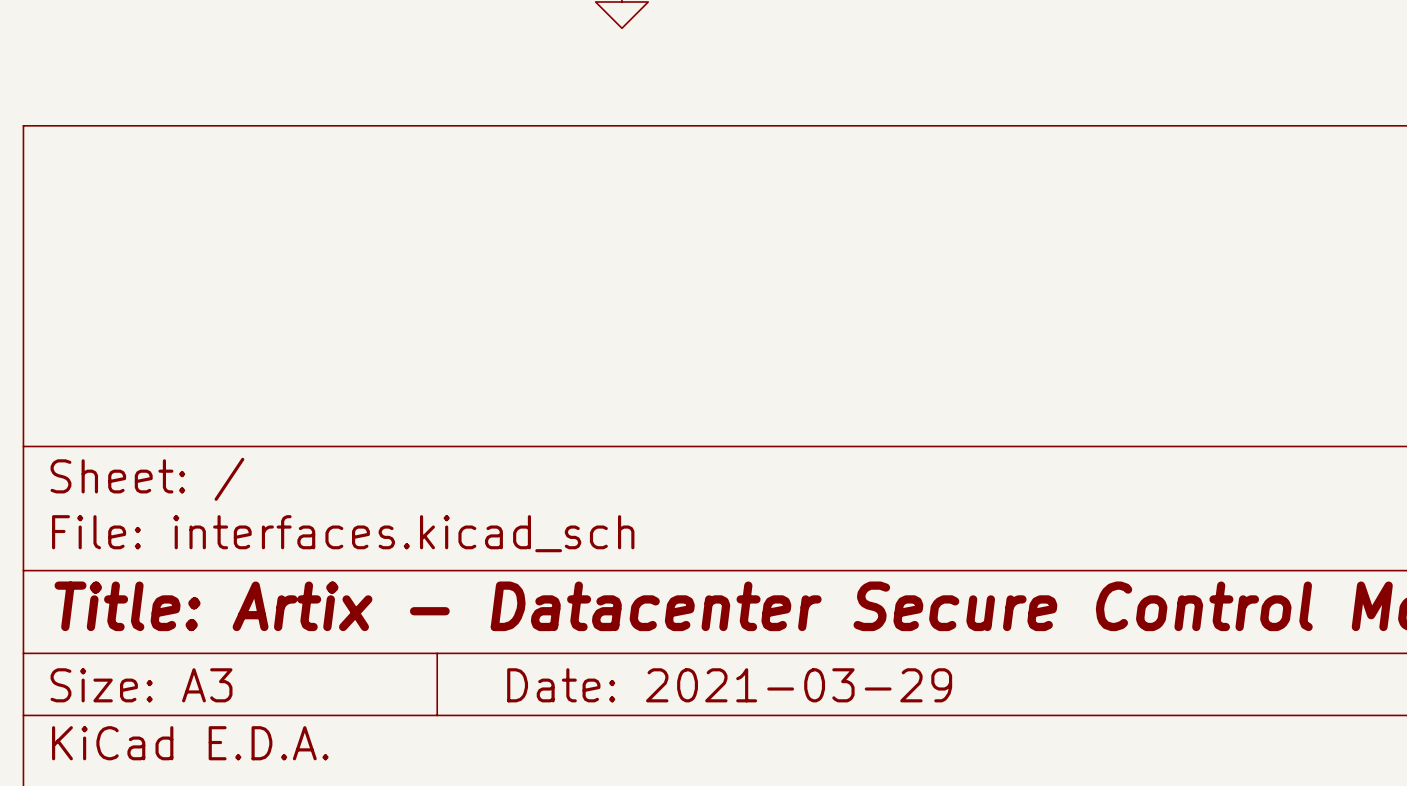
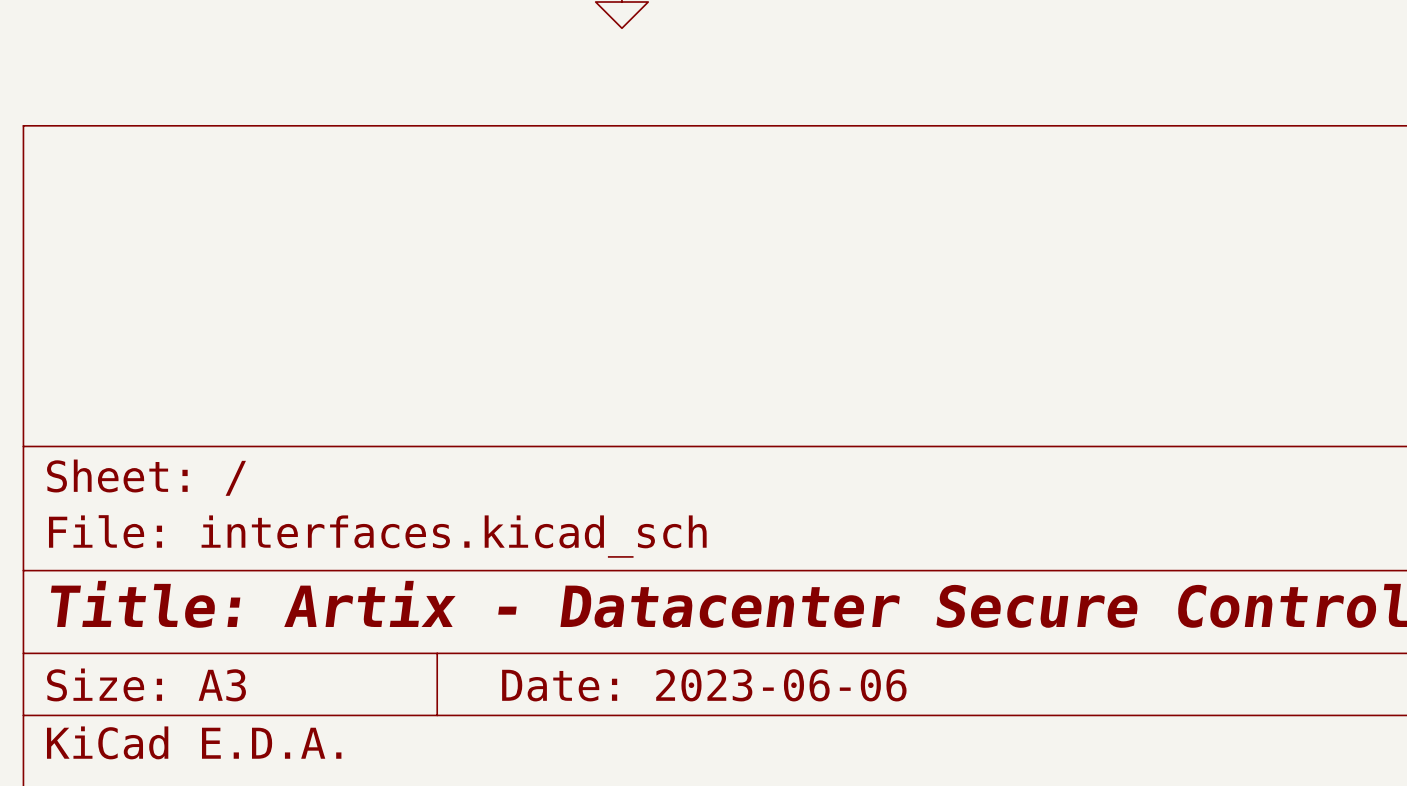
title block: Date: 2021-03-29 (729, 685) -> Date: 2023-06-06 (704, 685)

